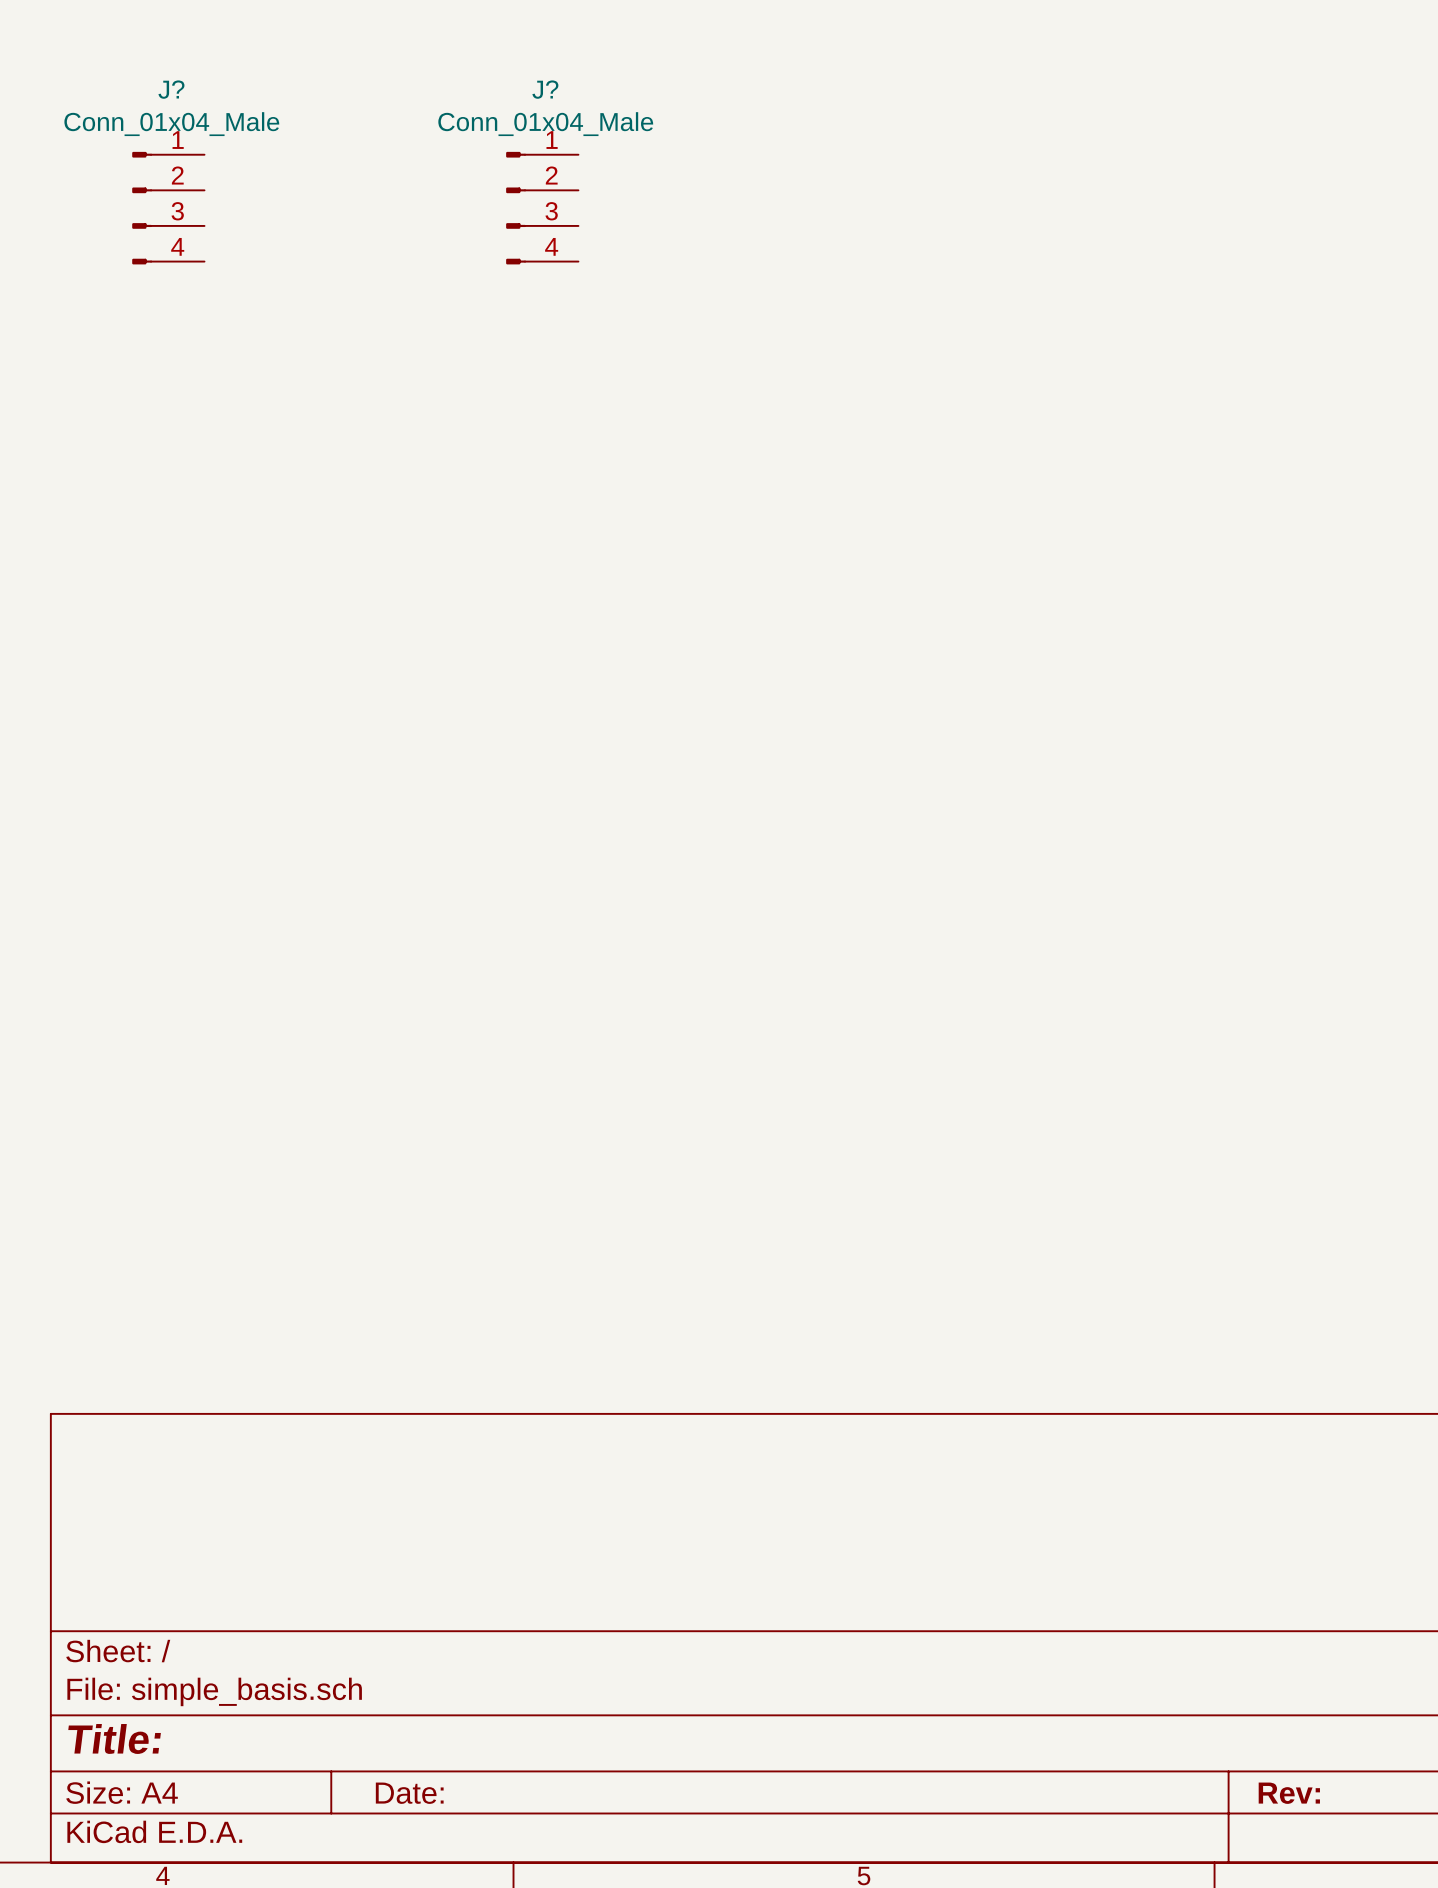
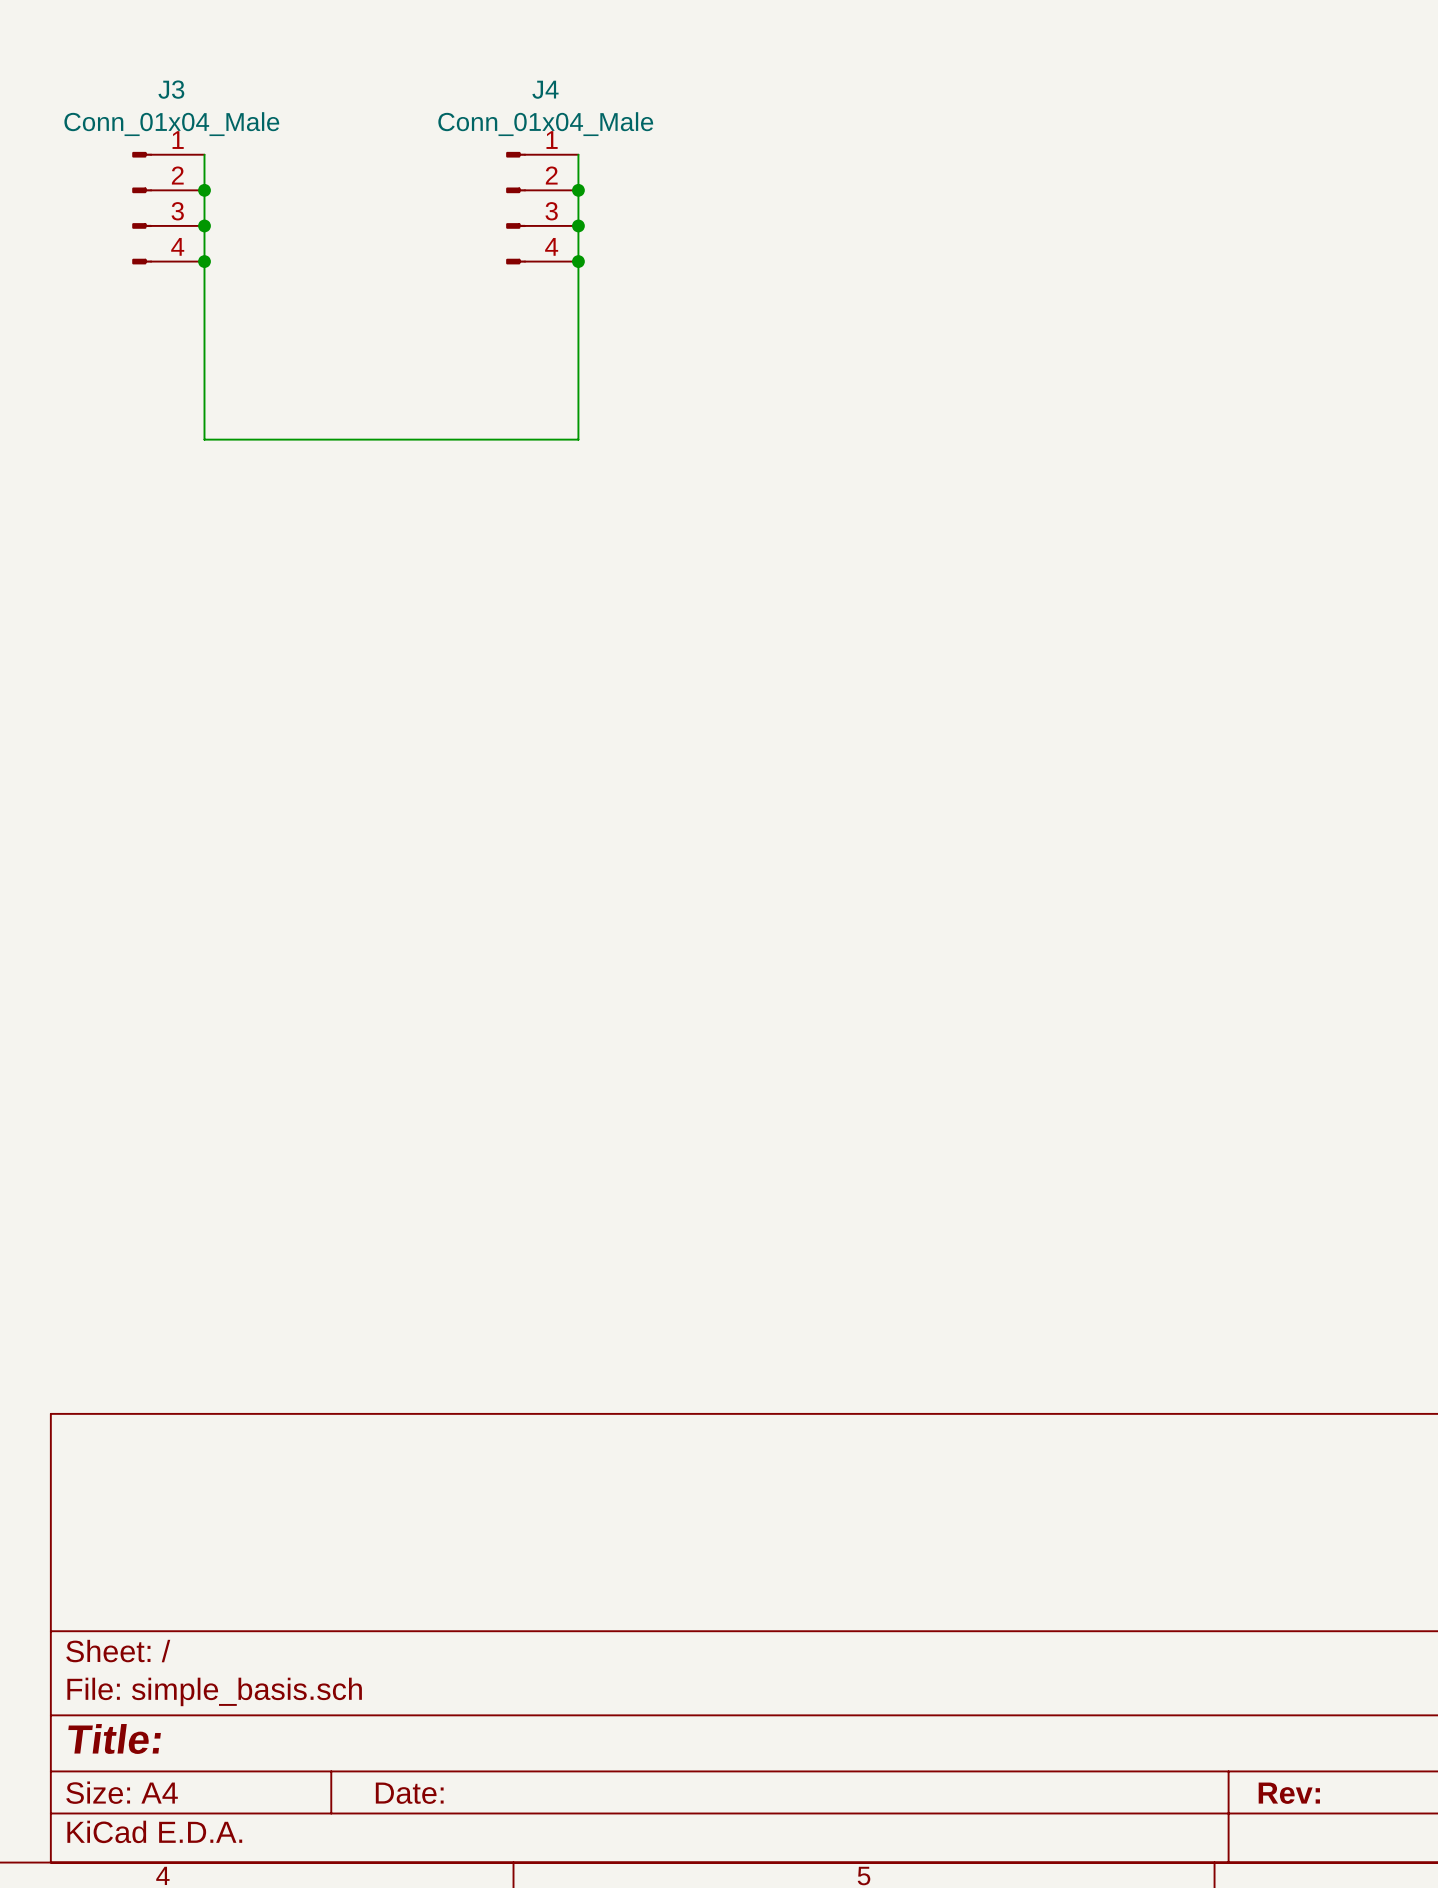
J? name: J? (171, 89) -> J3 (171, 89)
J? name: J? (545, 89) -> J4 (545, 89)
wire: none -> (204, 154) (204, 439) (578, 439) (578, 154)
junction: none -> (204, 190)
junction: none -> (578, 190)
junction: none -> (204, 225)
junction: none -> (578, 225)
junction: none -> (204, 261)
junction: none -> (578, 261)

